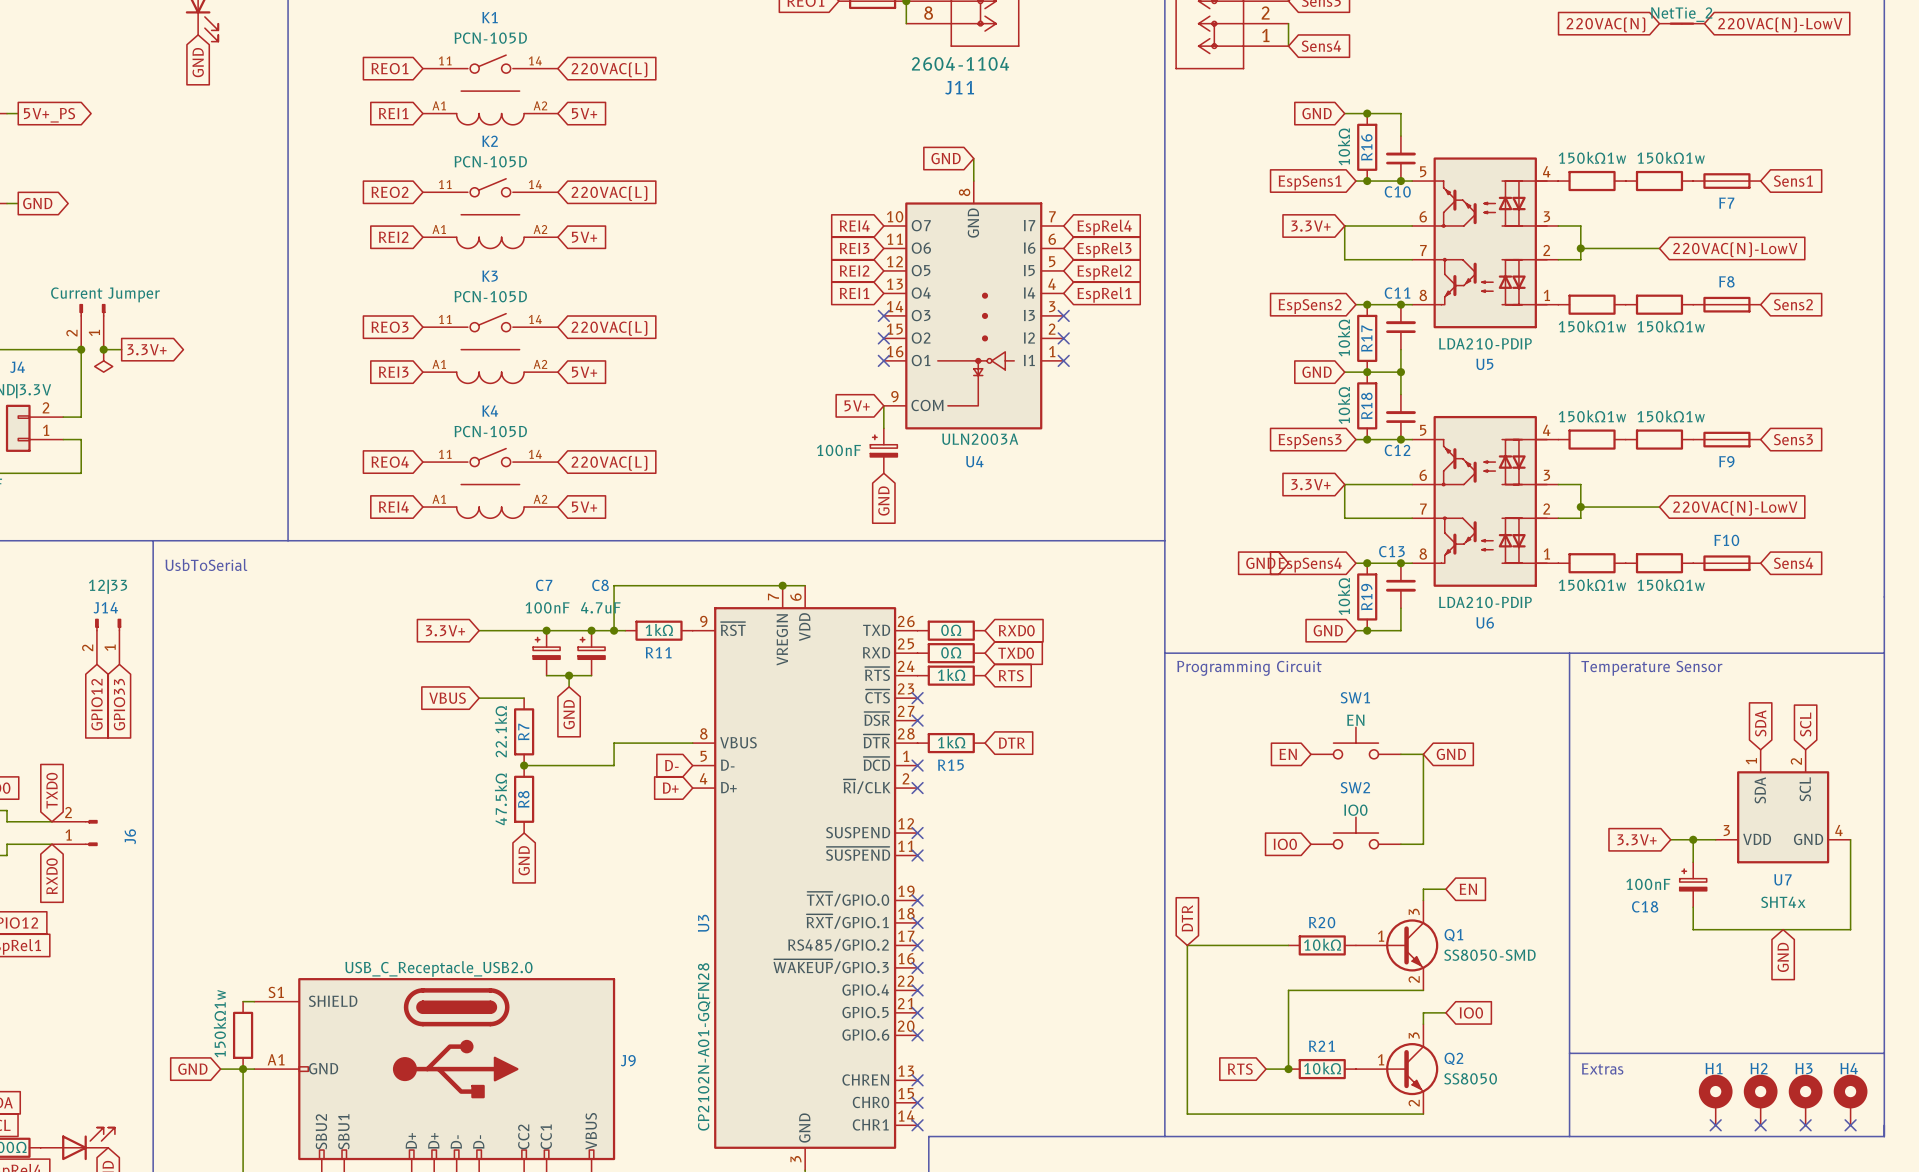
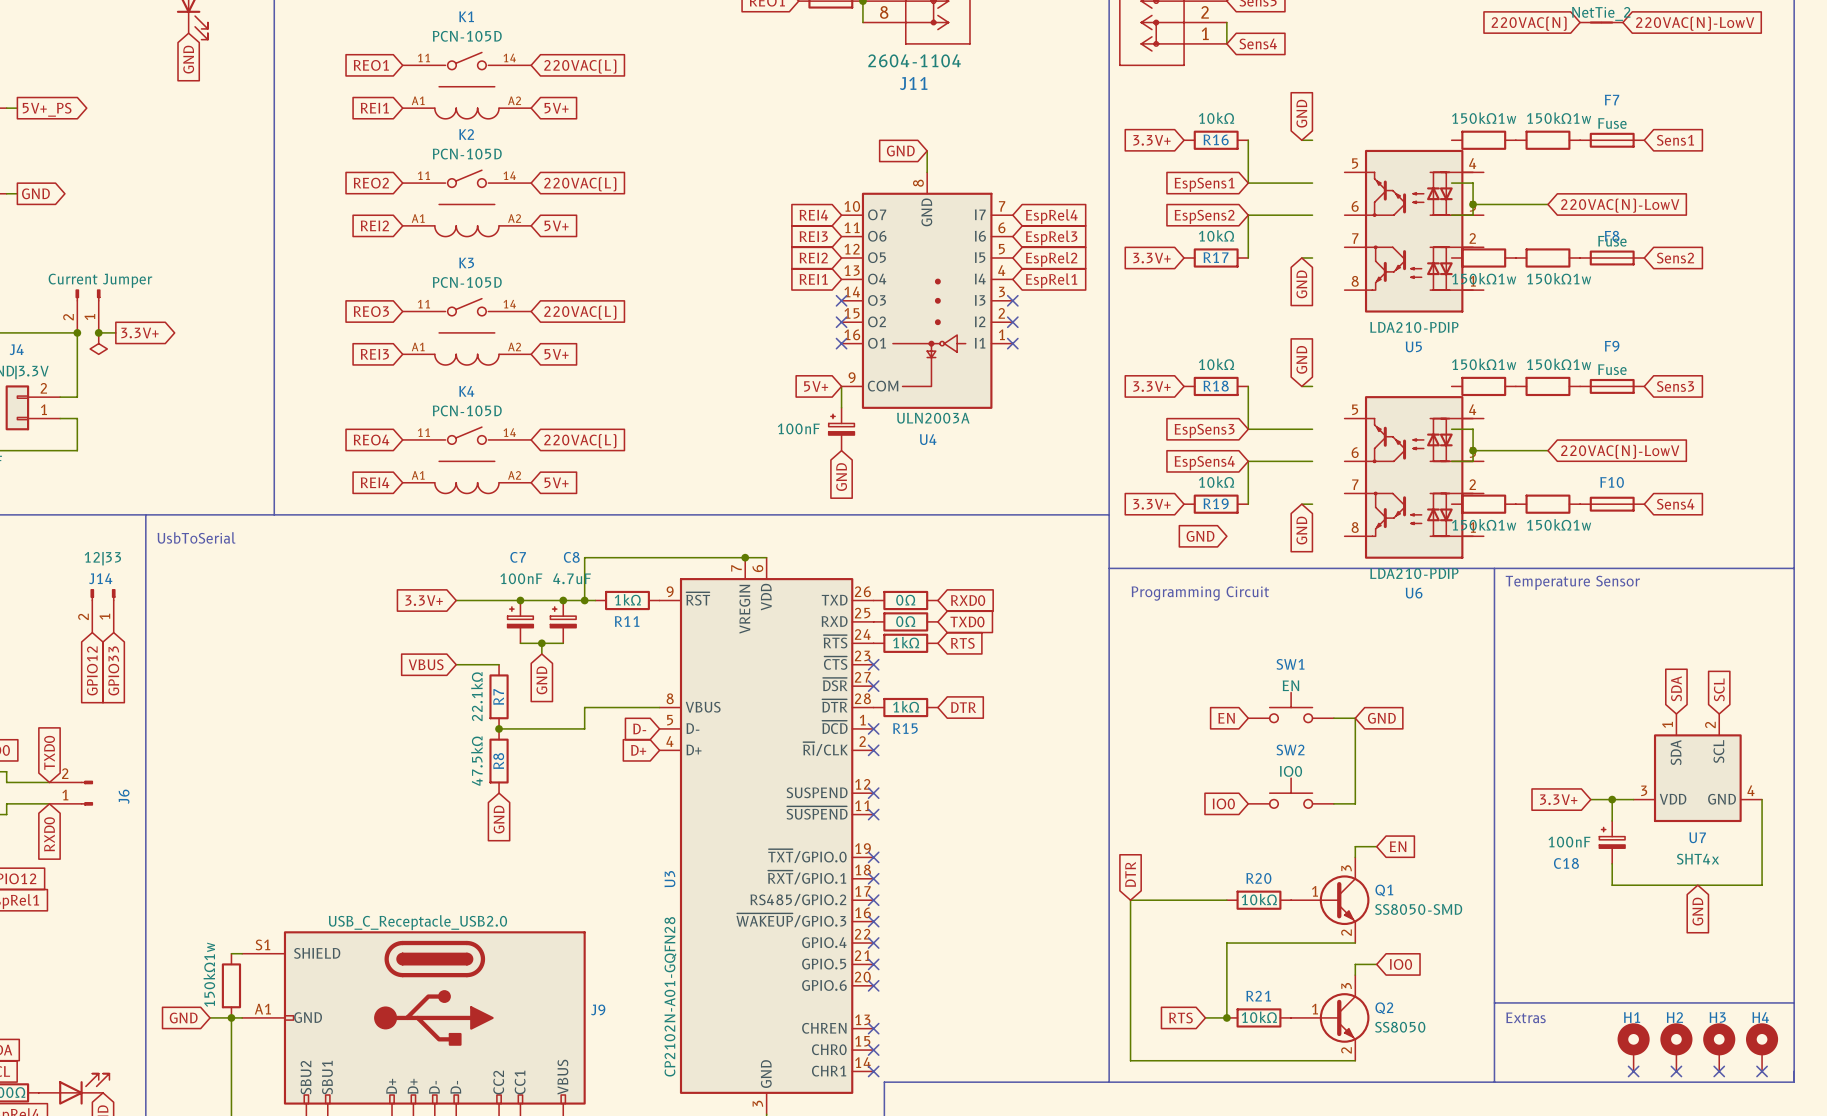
global label rotation: 0° (1317, 113) -> 90° clockwise (1301, 113)
wire: (1344, 113) (1400, 113) (1400, 136) -> none
junction: (1367, 113) -> none
F7 value: none -> Fuse (1612, 123)
global label: none -> 3.3V+ (1151, 140)
wire: none -> (1248, 140) (1248, 183) (1312, 183)
R16 rotation: 0° (1367, 147) -> 90° clockwise (1216, 140)
R16 position: (1367, 147) -> (1216, 140)
part: none -> 150kΩ1w (1483, 140)
part: none -> 150kΩ1w (1547, 140)
C10: (1400, 158) -> none
wire: (1355, 181) (1412, 181) -> none
junction: (1367, 181) -> none
junction: (1400, 181) -> none
part: 150kΩ1w (1592, 181) -> none
part: 150kΩ1w (1659, 181) -> none
F7 position: (1726, 181) -> (1612, 140)
global label position: Sens1 (1793, 181) -> Sens1 (1675, 140)
global label position: EspSens1 (1310, 182) -> EspSens1 (1204, 184)
F7 name position: F7 (1726, 203) -> F7 (1612, 100)
wire: (1344, 225) (1344, 259) (1412, 259) -> (1280, 215) (1248, 215) (1248, 257)
wire: (1378, 225) (1412, 225) -> none
wire: (1558, 225) (1580, 225) (1580, 259) (1558, 259) -> (1451, 183) (1473, 183) (1473, 215) (1451, 215)
global label: 3.3V+ (1311, 226) -> none
wire: (1580, 248) (1659, 248) -> (1473, 204) (1547, 204)
junction position: (1580, 248) -> (1473, 204)
global label position: 220VAC(N)-LowV (1735, 249) -> 220VAC(N)-LowV (1620, 205)
F8 value: none -> Fuse (1612, 241)
wire: none -> (1301, 257) (1312, 257)
part: none -> 150kΩ1w (1483, 257)
part: none -> 150kΩ1w (1547, 257)
global label: none -> 3.3V+ (1151, 258)
global label: none -> GND (1301, 284)
wire: (1355, 304) (1412, 304) -> none
junction: (1367, 304) -> none
junction: (1400, 304) -> none
part: 150kΩ1w (1592, 304) -> none
part: 150kΩ1w (1659, 304) -> none
F8 position: (1726, 304) -> (1612, 257)
global label position: Sens2 (1793, 304) -> Sens2 (1675, 258)
global label position: EspSens2 (1310, 306) -> EspSens2 (1204, 216)
C11: (1400, 327) -> none
R17 rotation: 0° (1367, 338) -> 90° clockwise (1216, 257)
R17 position: (1367, 338) -> (1216, 257)
wire: (1400, 349) (1400, 394) -> none
global label rotation: 0° (1317, 372) -> 90° clockwise (1301, 359)
wire: (1344, 372) (1400, 372) -> none
junction: (1367, 372) -> none
junction: (1400, 372) -> none
F9 value: none -> Fuse (1612, 369)
global label: none -> 3.3V+ (1151, 386)
wire: none -> (1248, 386) (1248, 429) (1312, 429)
R18 rotation: 0° (1367, 405) -> 90° clockwise (1216, 386)
R18 position: (1367, 405) -> (1216, 386)
part: none -> 150kΩ1w (1483, 386)
part: none -> 150kΩ1w (1547, 386)
C12: (1400, 417) -> none
wire: (1355, 439) (1412, 439) -> none
junction: (1367, 439) -> none
junction: (1400, 439) -> none
part: 150kΩ1w (1592, 439) -> none
part: 150kΩ1w (1659, 439) -> none
F9 position: (1726, 439) -> (1612, 386)
global label position: Sens3 (1793, 439) -> Sens3 (1675, 386)
global label position: EspSens3 (1310, 441) -> EspSens3 (1204, 431)
F9 name position: F9 (1726, 461) -> F9 (1612, 346)
global label: 3.3V+ (1311, 484) -> none
wire: (1344, 484) (1344, 518) (1412, 518) -> (1280, 461) (1248, 461) (1248, 504)
wire: (1378, 484) (1412, 484) -> none
wire: (1558, 484) (1580, 484) (1580, 518) (1558, 518) -> (1451, 429) (1473, 429) (1473, 461) (1451, 461)
wire: (1580, 507) (1659, 507) -> (1473, 450) (1547, 450)
junction position: (1580, 507) -> (1473, 450)
global label position: 220VAC(N)-LowV (1735, 508) -> 220VAC(N)-LowV (1620, 451)
global label: none -> 3.3V+ (1151, 504)
wire: none -> (1301, 504) (1312, 504)
part: none -> 150kΩ1w (1483, 504)
part: none -> 150kΩ1w (1547, 504)
global label: none -> GND (1301, 530)
wire: (1355, 563) (1412, 563) -> none
junction: (1367, 563) -> none
junction: (1400, 563) -> none
part: 150kΩ1w (1592, 563) -> none
part: 150kΩ1w (1659, 563) -> none
F10 position: (1726, 563) -> (1612, 504)
global label position: Sens4 (1793, 563) -> Sens4 (1675, 504)
global label position: EspSens4 (1310, 565) -> EspSens4 (1204, 463)
C13: (1400, 585) -> none
R19 rotation: 0° (1367, 596) -> 90° clockwise (1216, 504)
R19 position: (1367, 596) -> (1216, 504)
line: none -> (1494, 568) (1494, 621)
wire: (1400, 608) (1400, 630) (1355, 630) -> none
global label: GND (1328, 630) -> none
junction: (1367, 630) -> none
line: (1164, 653) (1884, 653) -> (1109, 568) (1794, 568)
text position: Programming Circuit (1249, 668) -> Programming Circuit (1200, 593)
text position: Temperature Sensor (1651, 668) -> Temperature Sensor (1572, 582)

